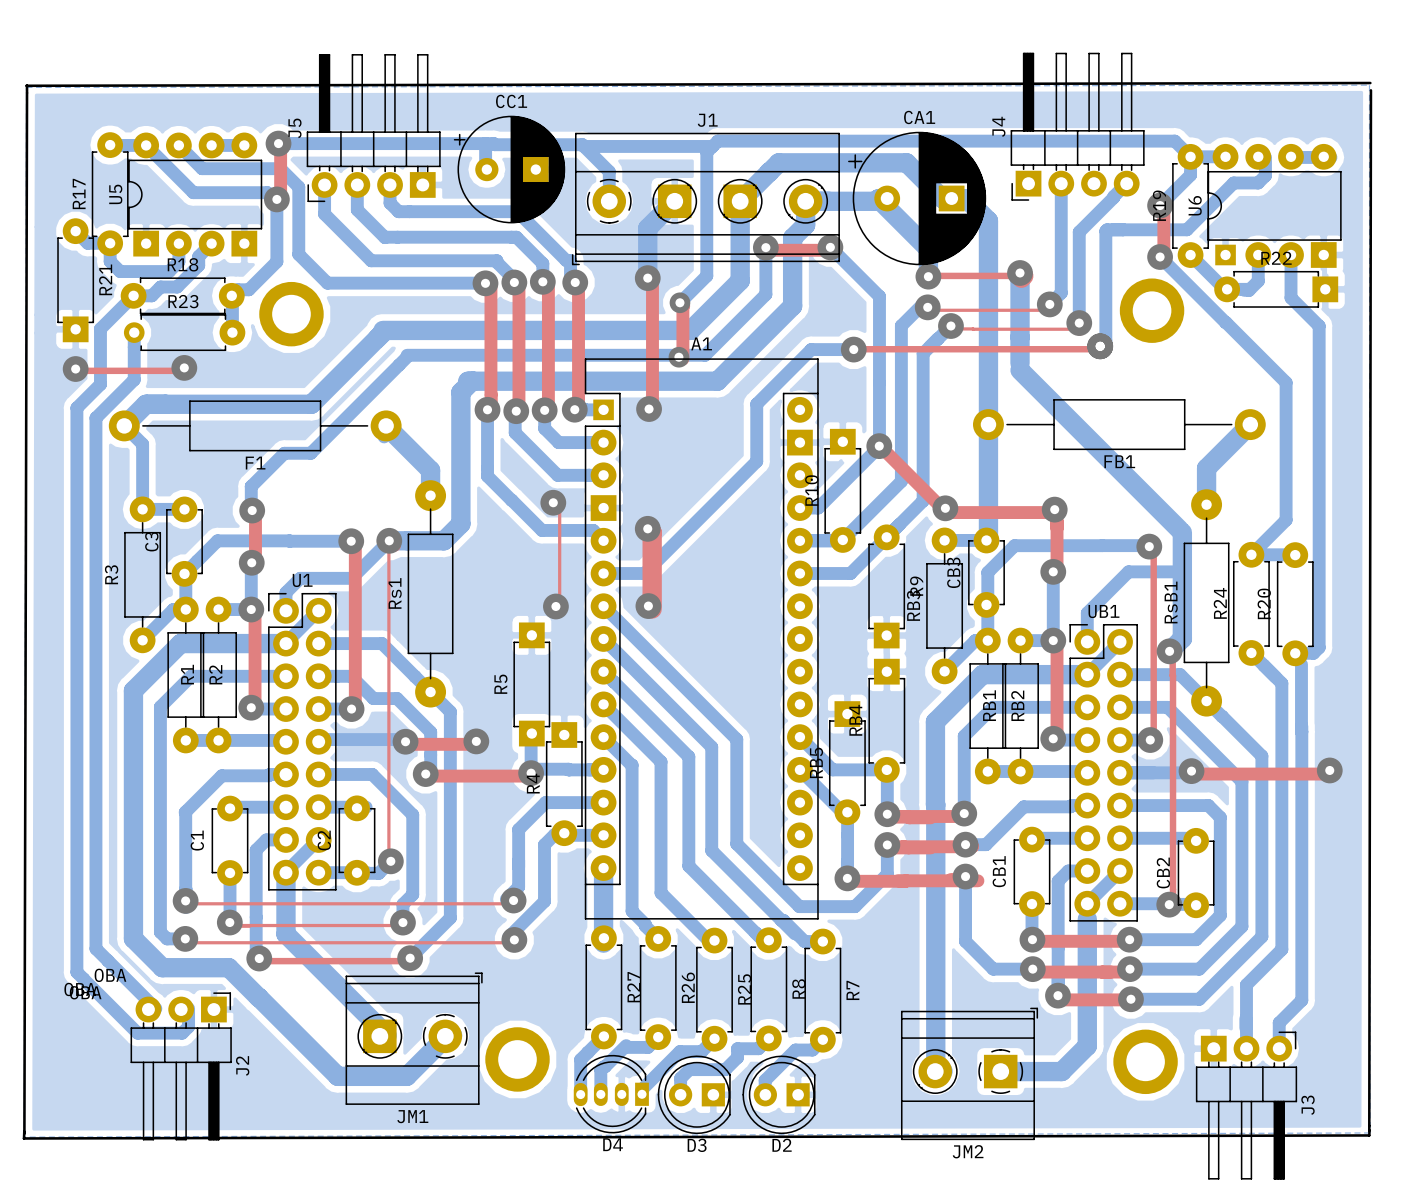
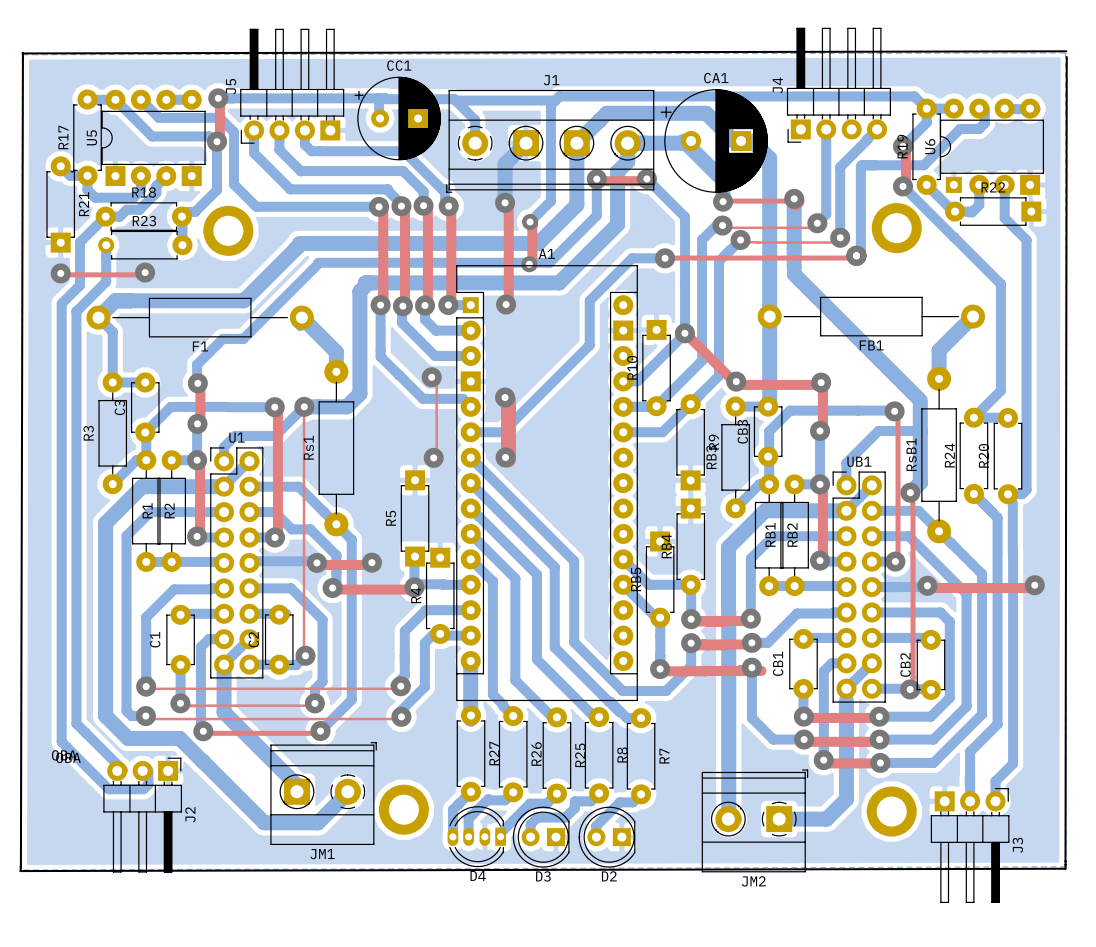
text: OBA (110, 975) -> none

